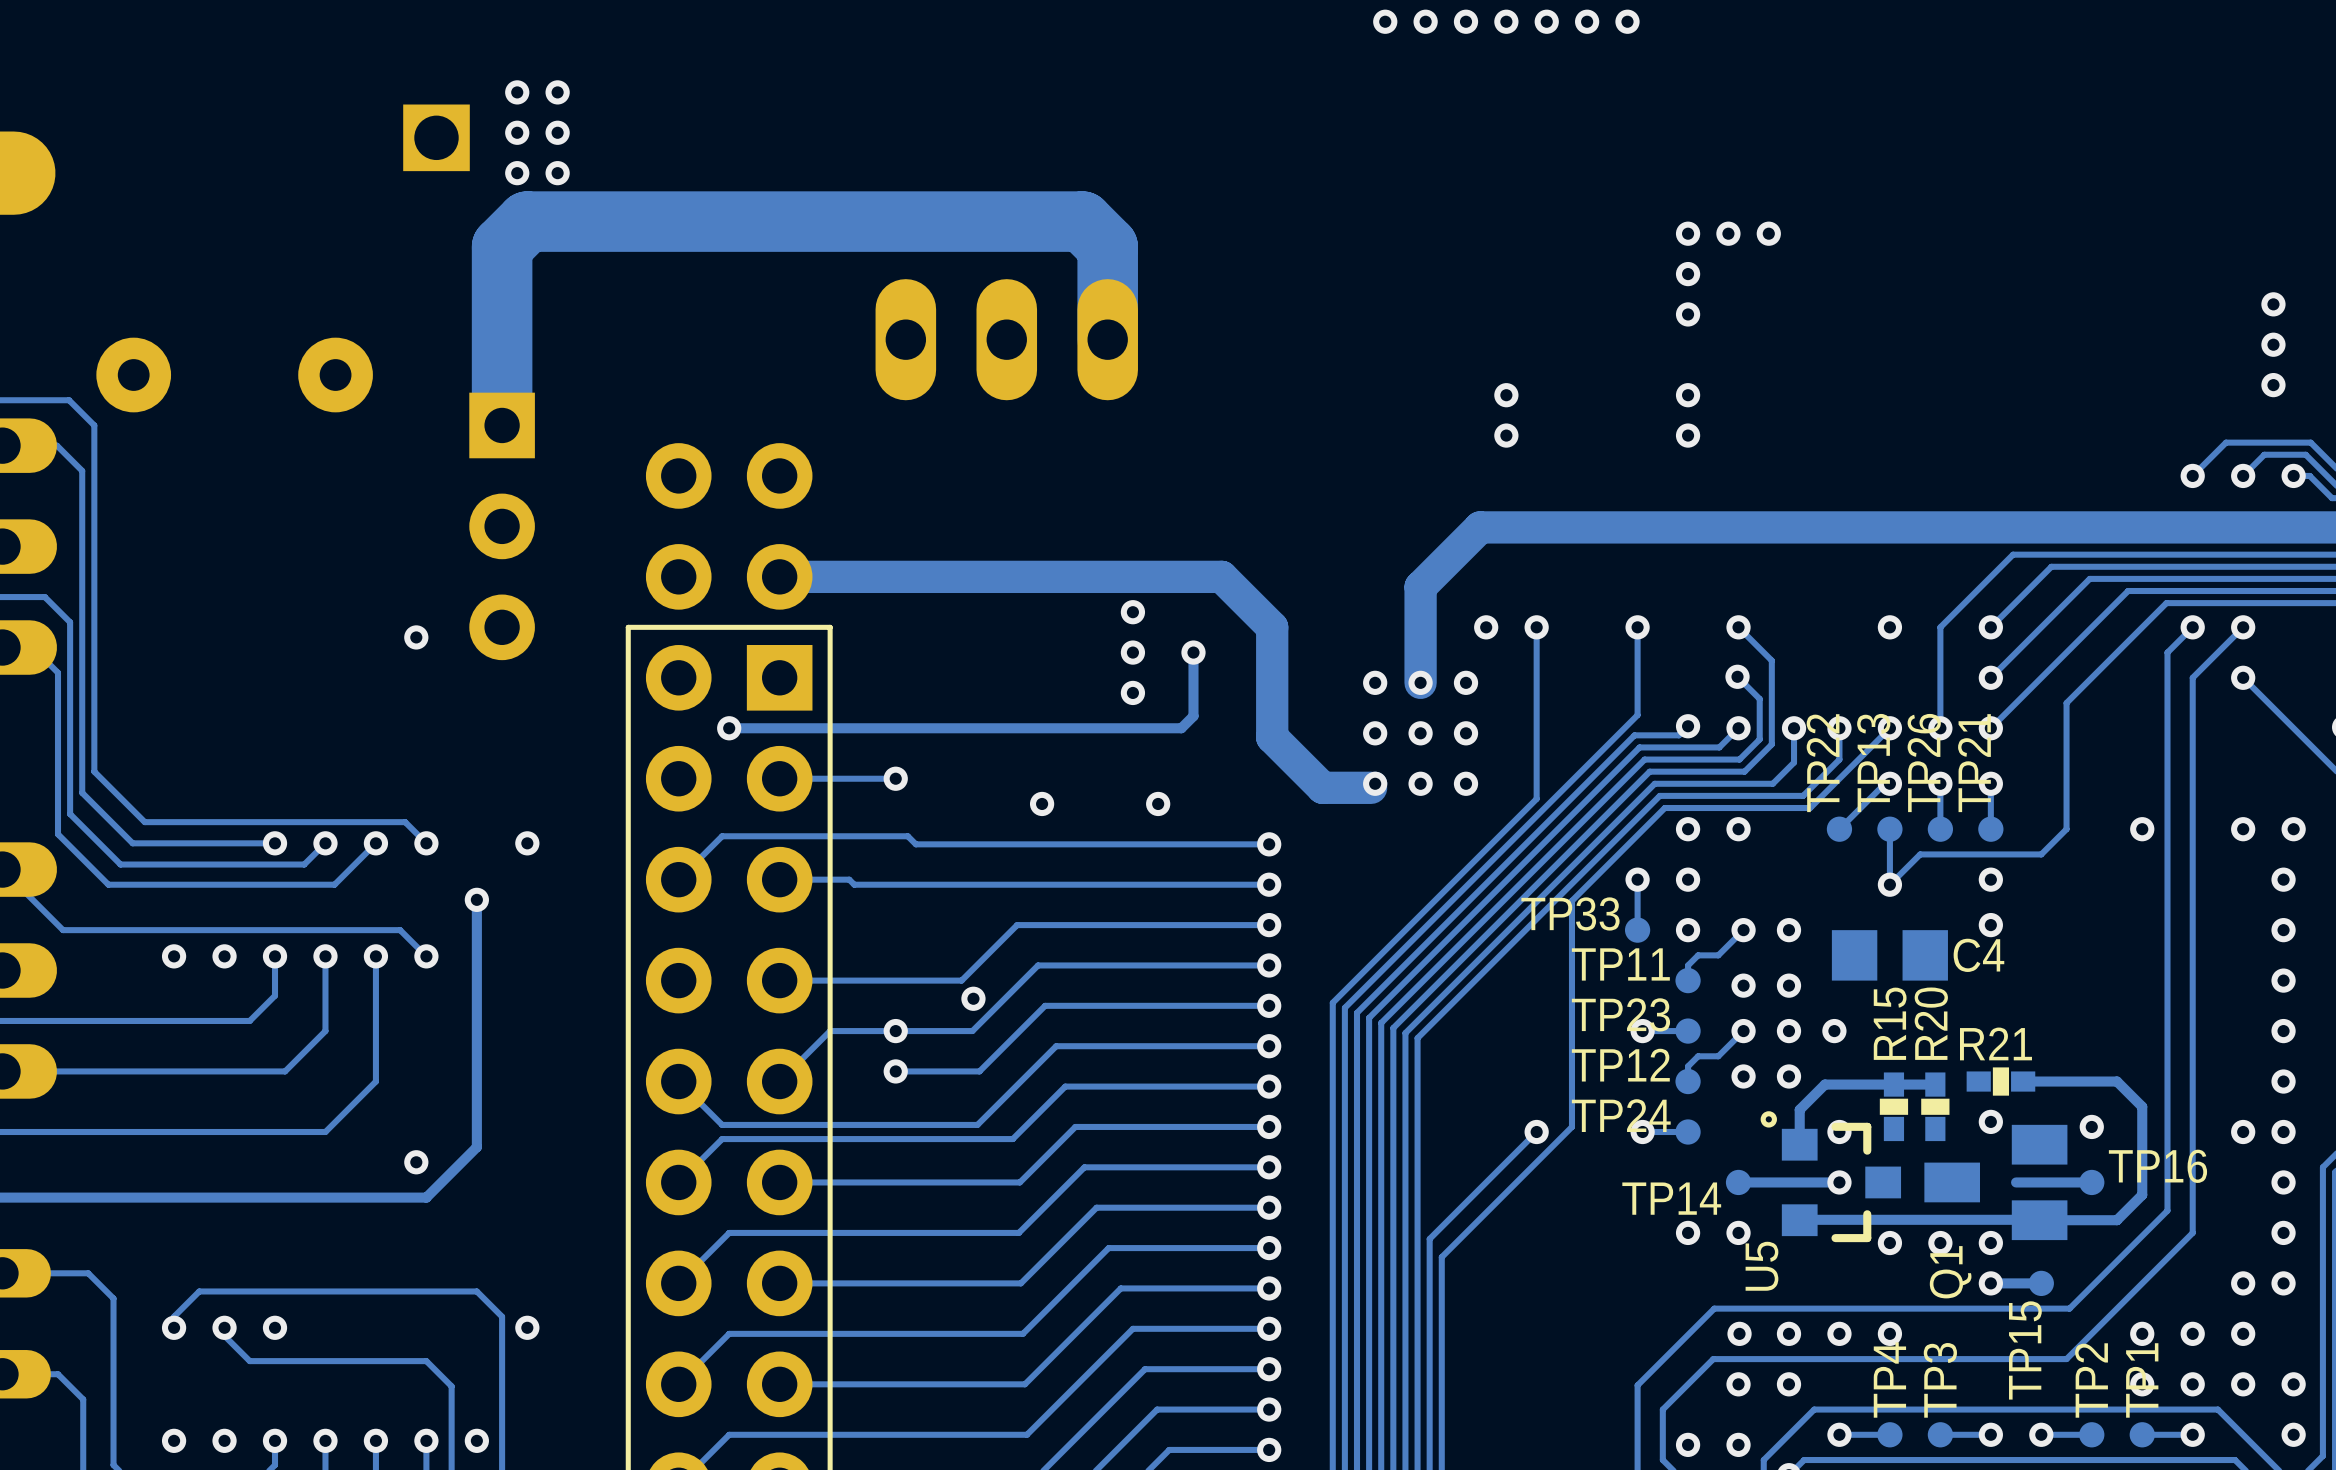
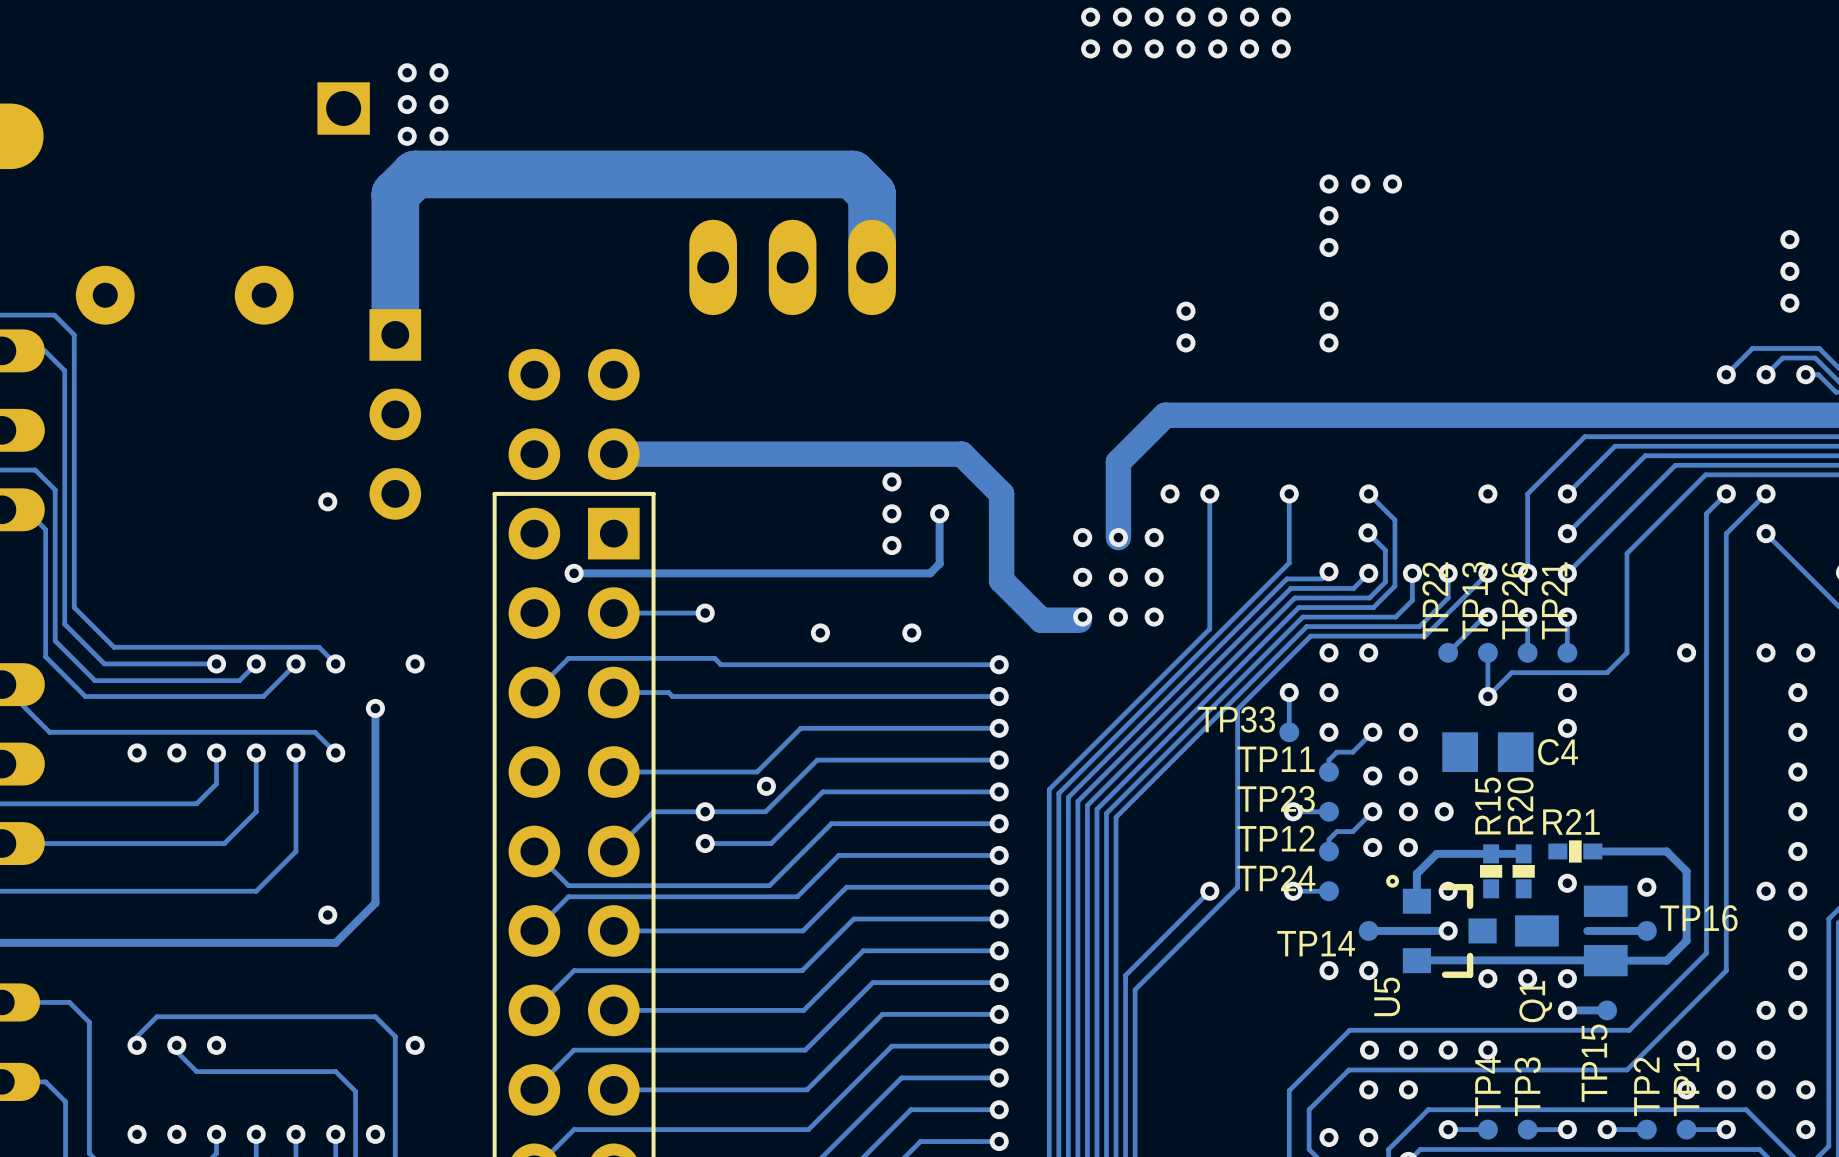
via: none -> (1090, 48)
via: none -> (1122, 48)
via: none -> (1154, 48)
via: none -> (1185, 48)
via: none -> (1217, 48)
via: none -> (1249, 48)
via: none -> (1281, 48)

